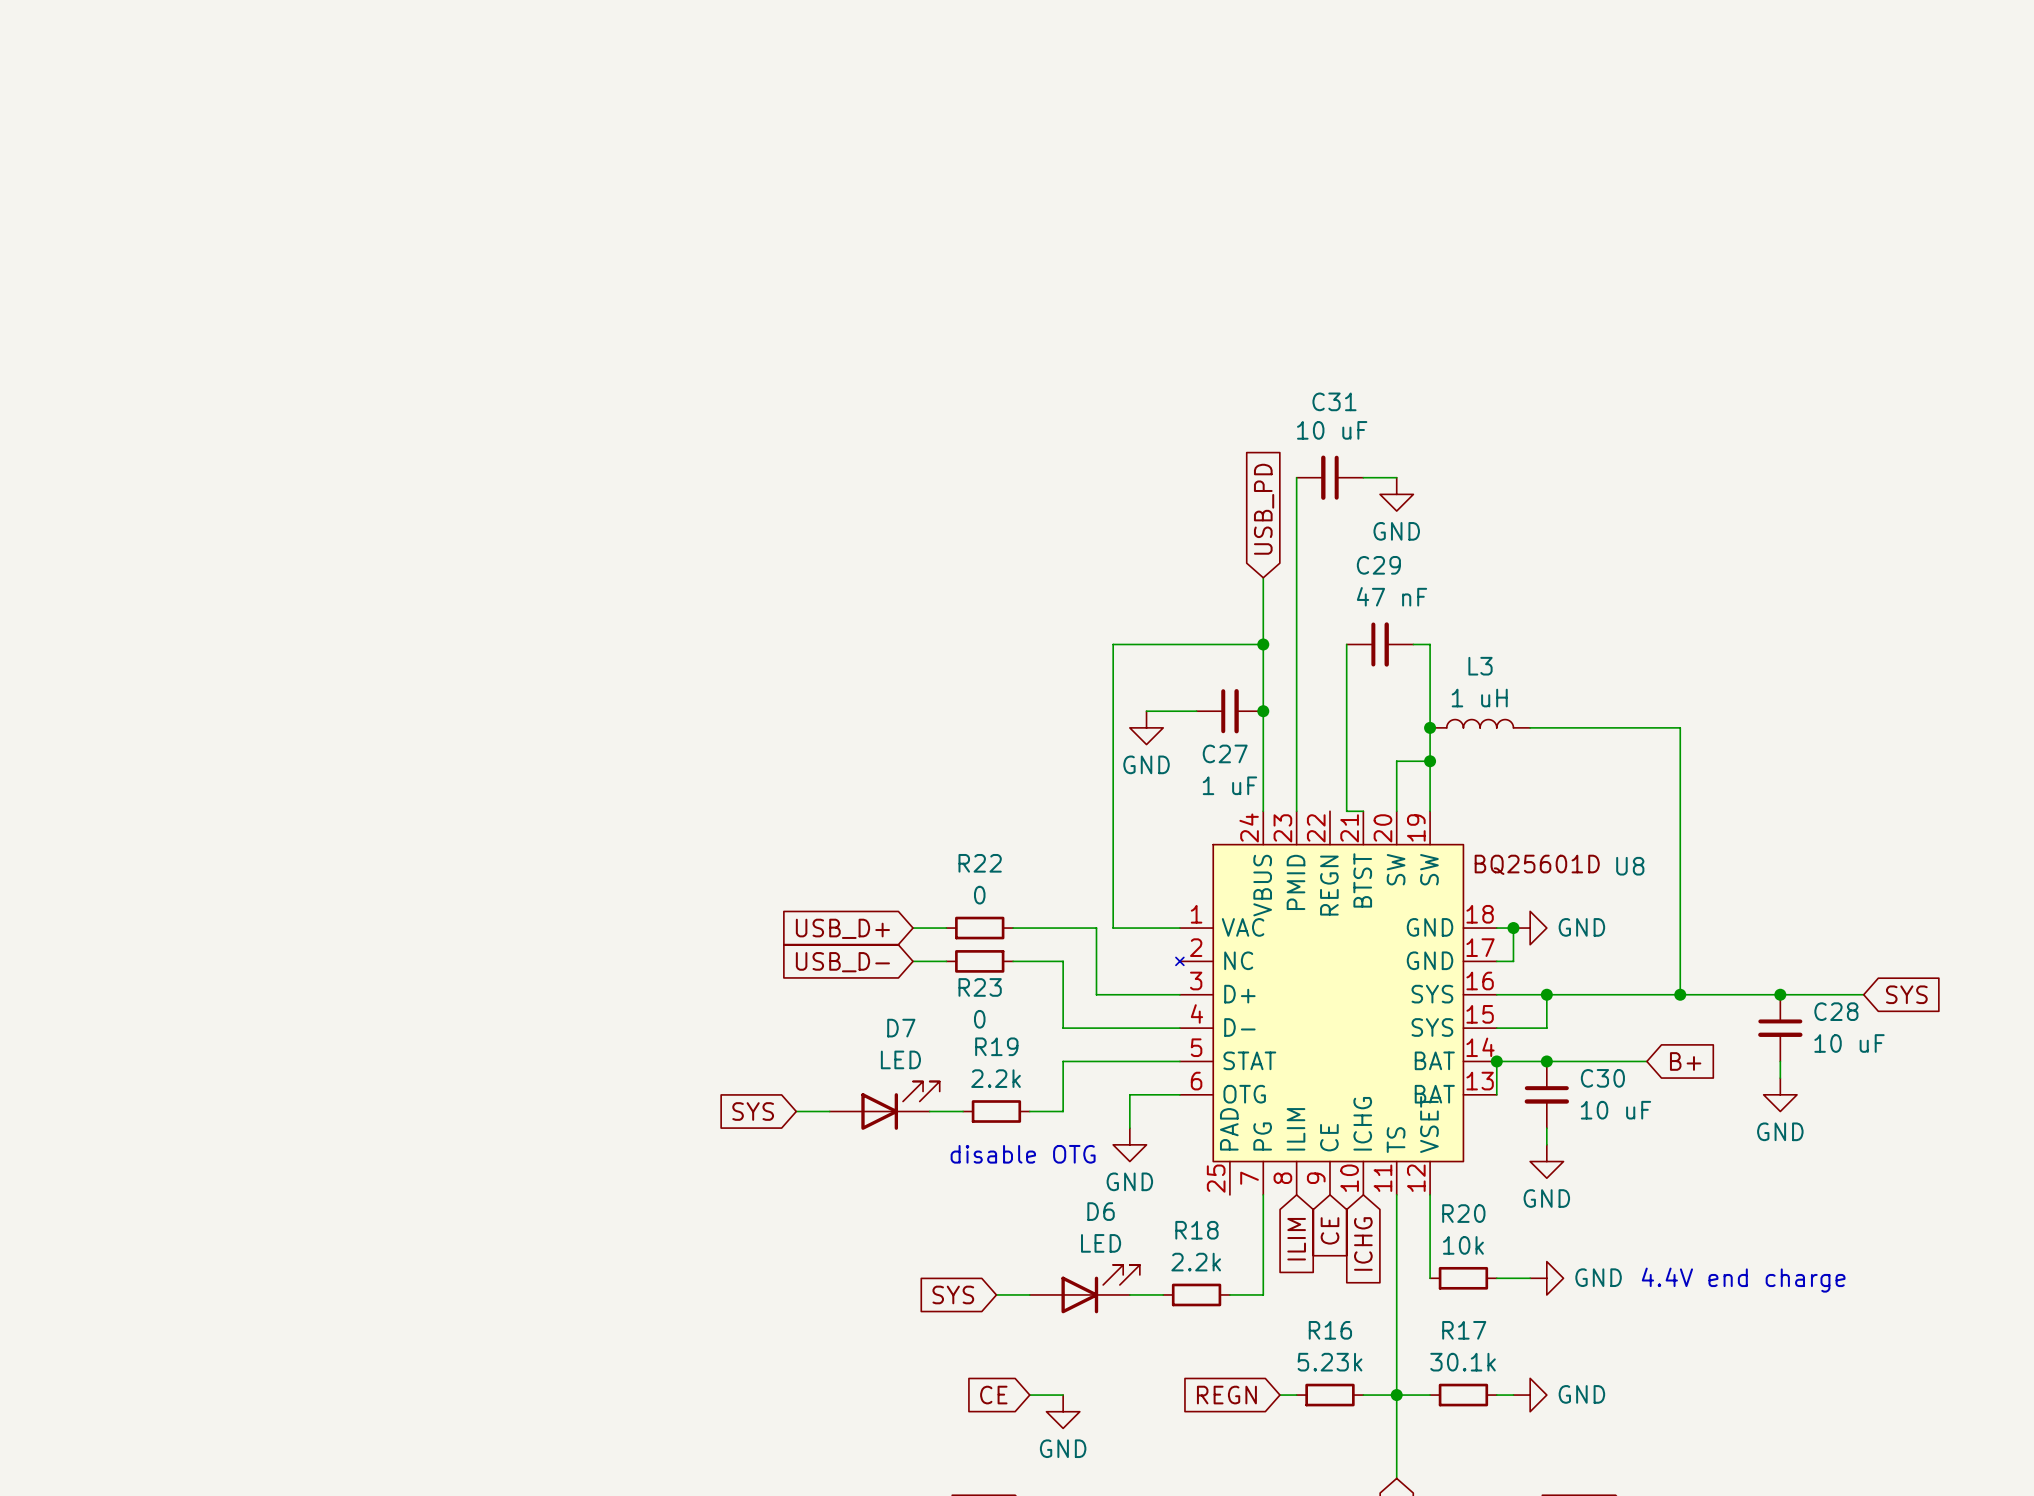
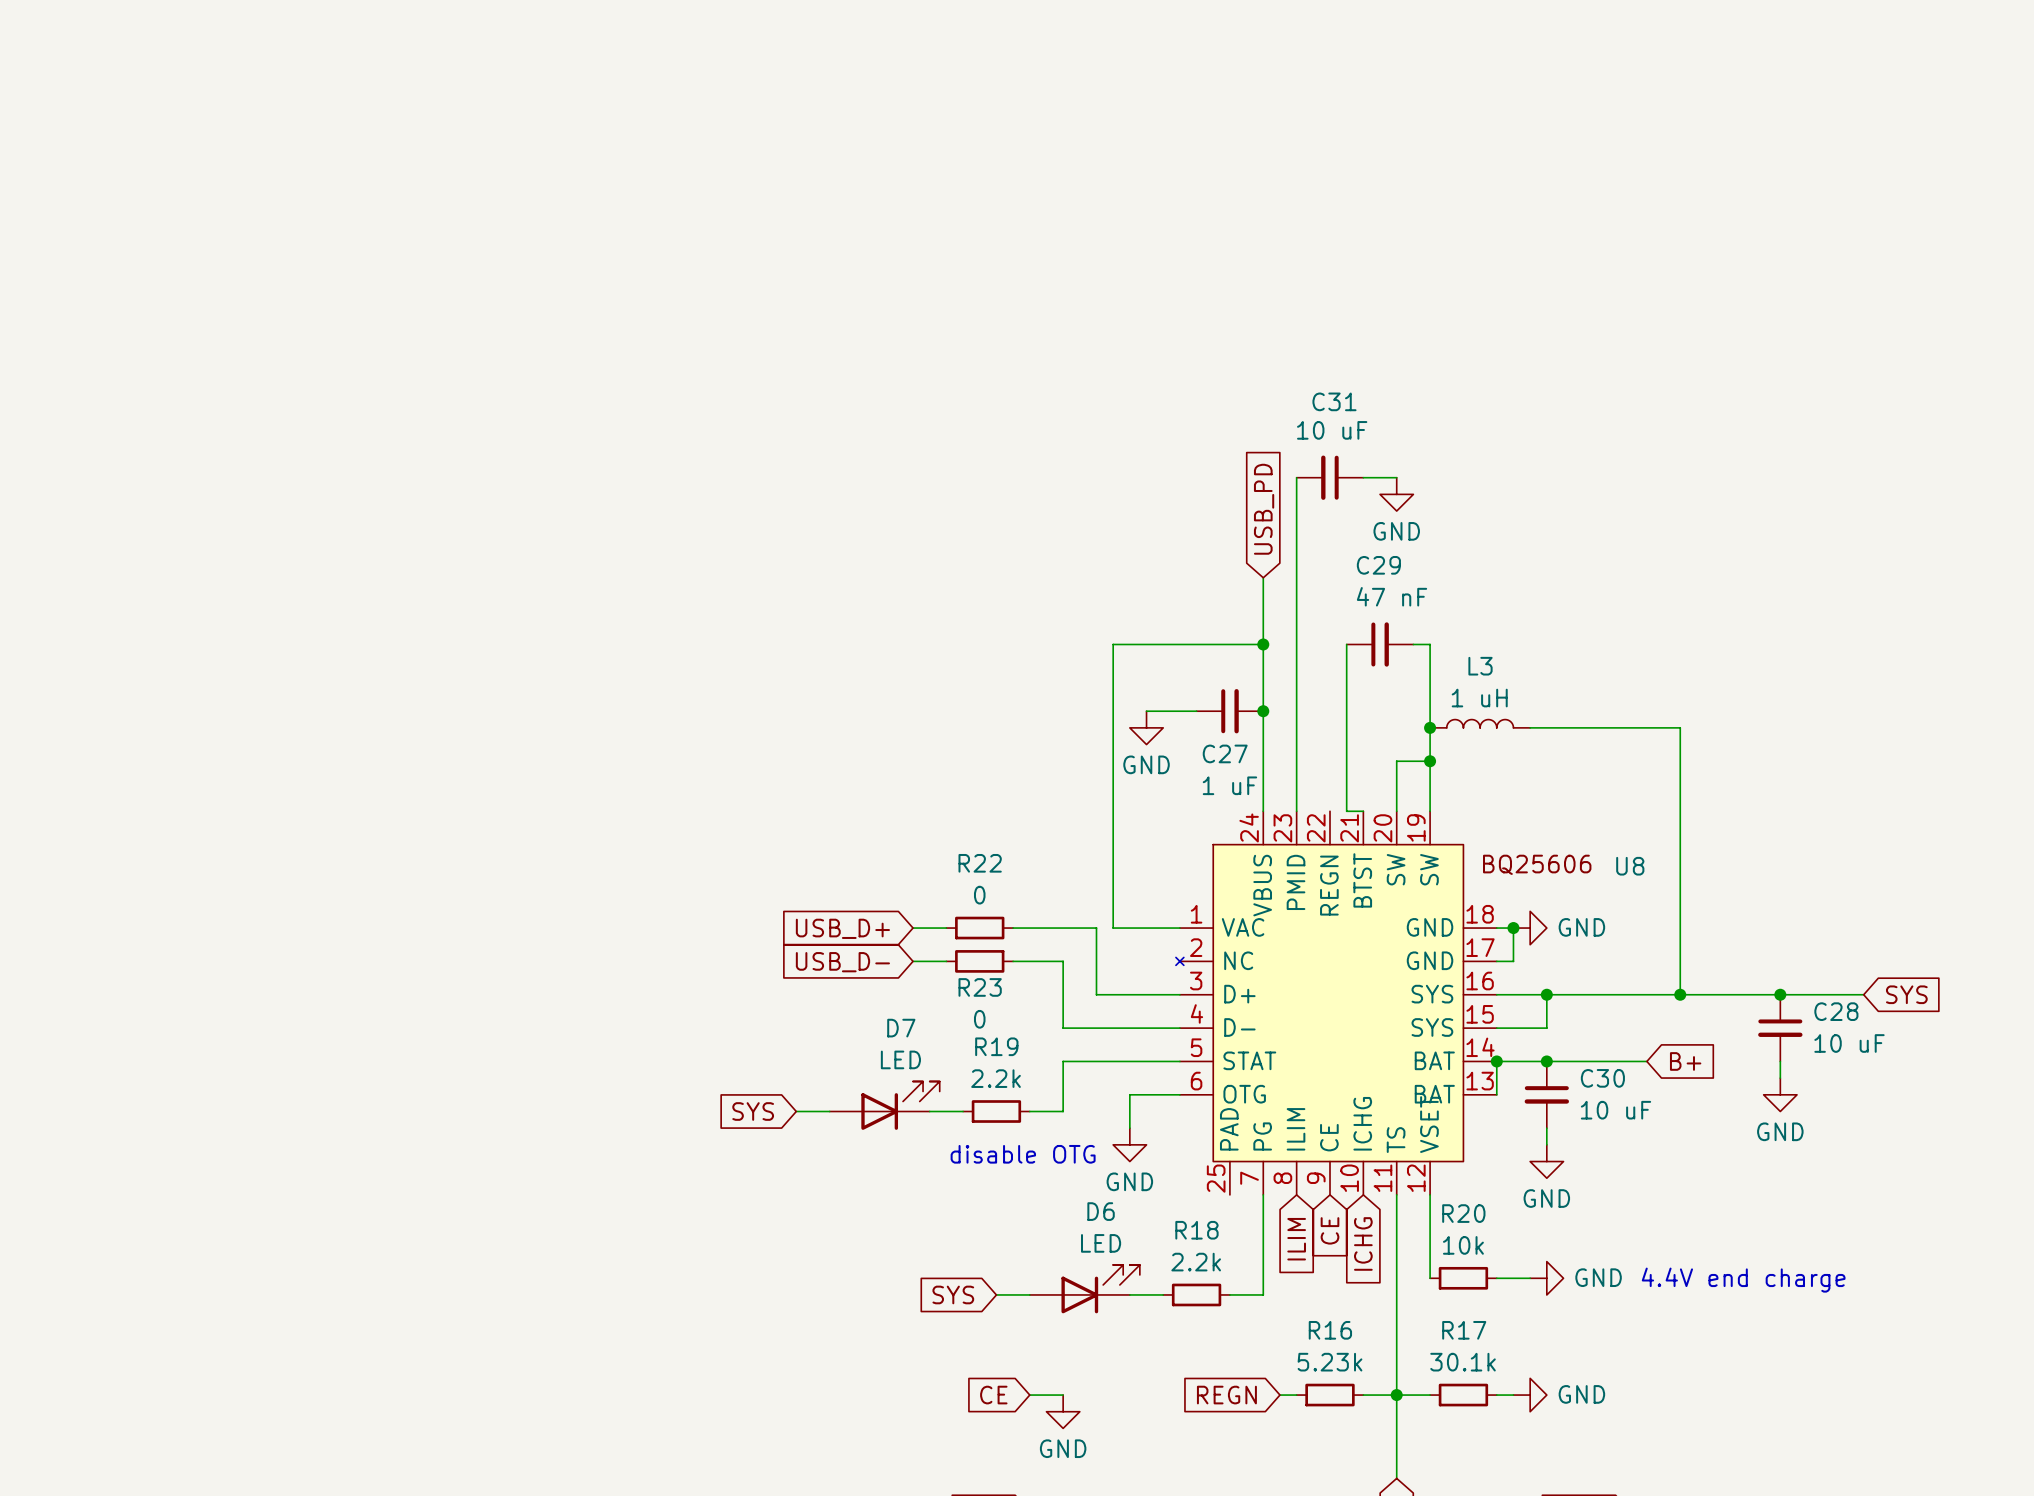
U8 text: BQ25601D (1537, 864) -> BQ25606 (1537, 864)

